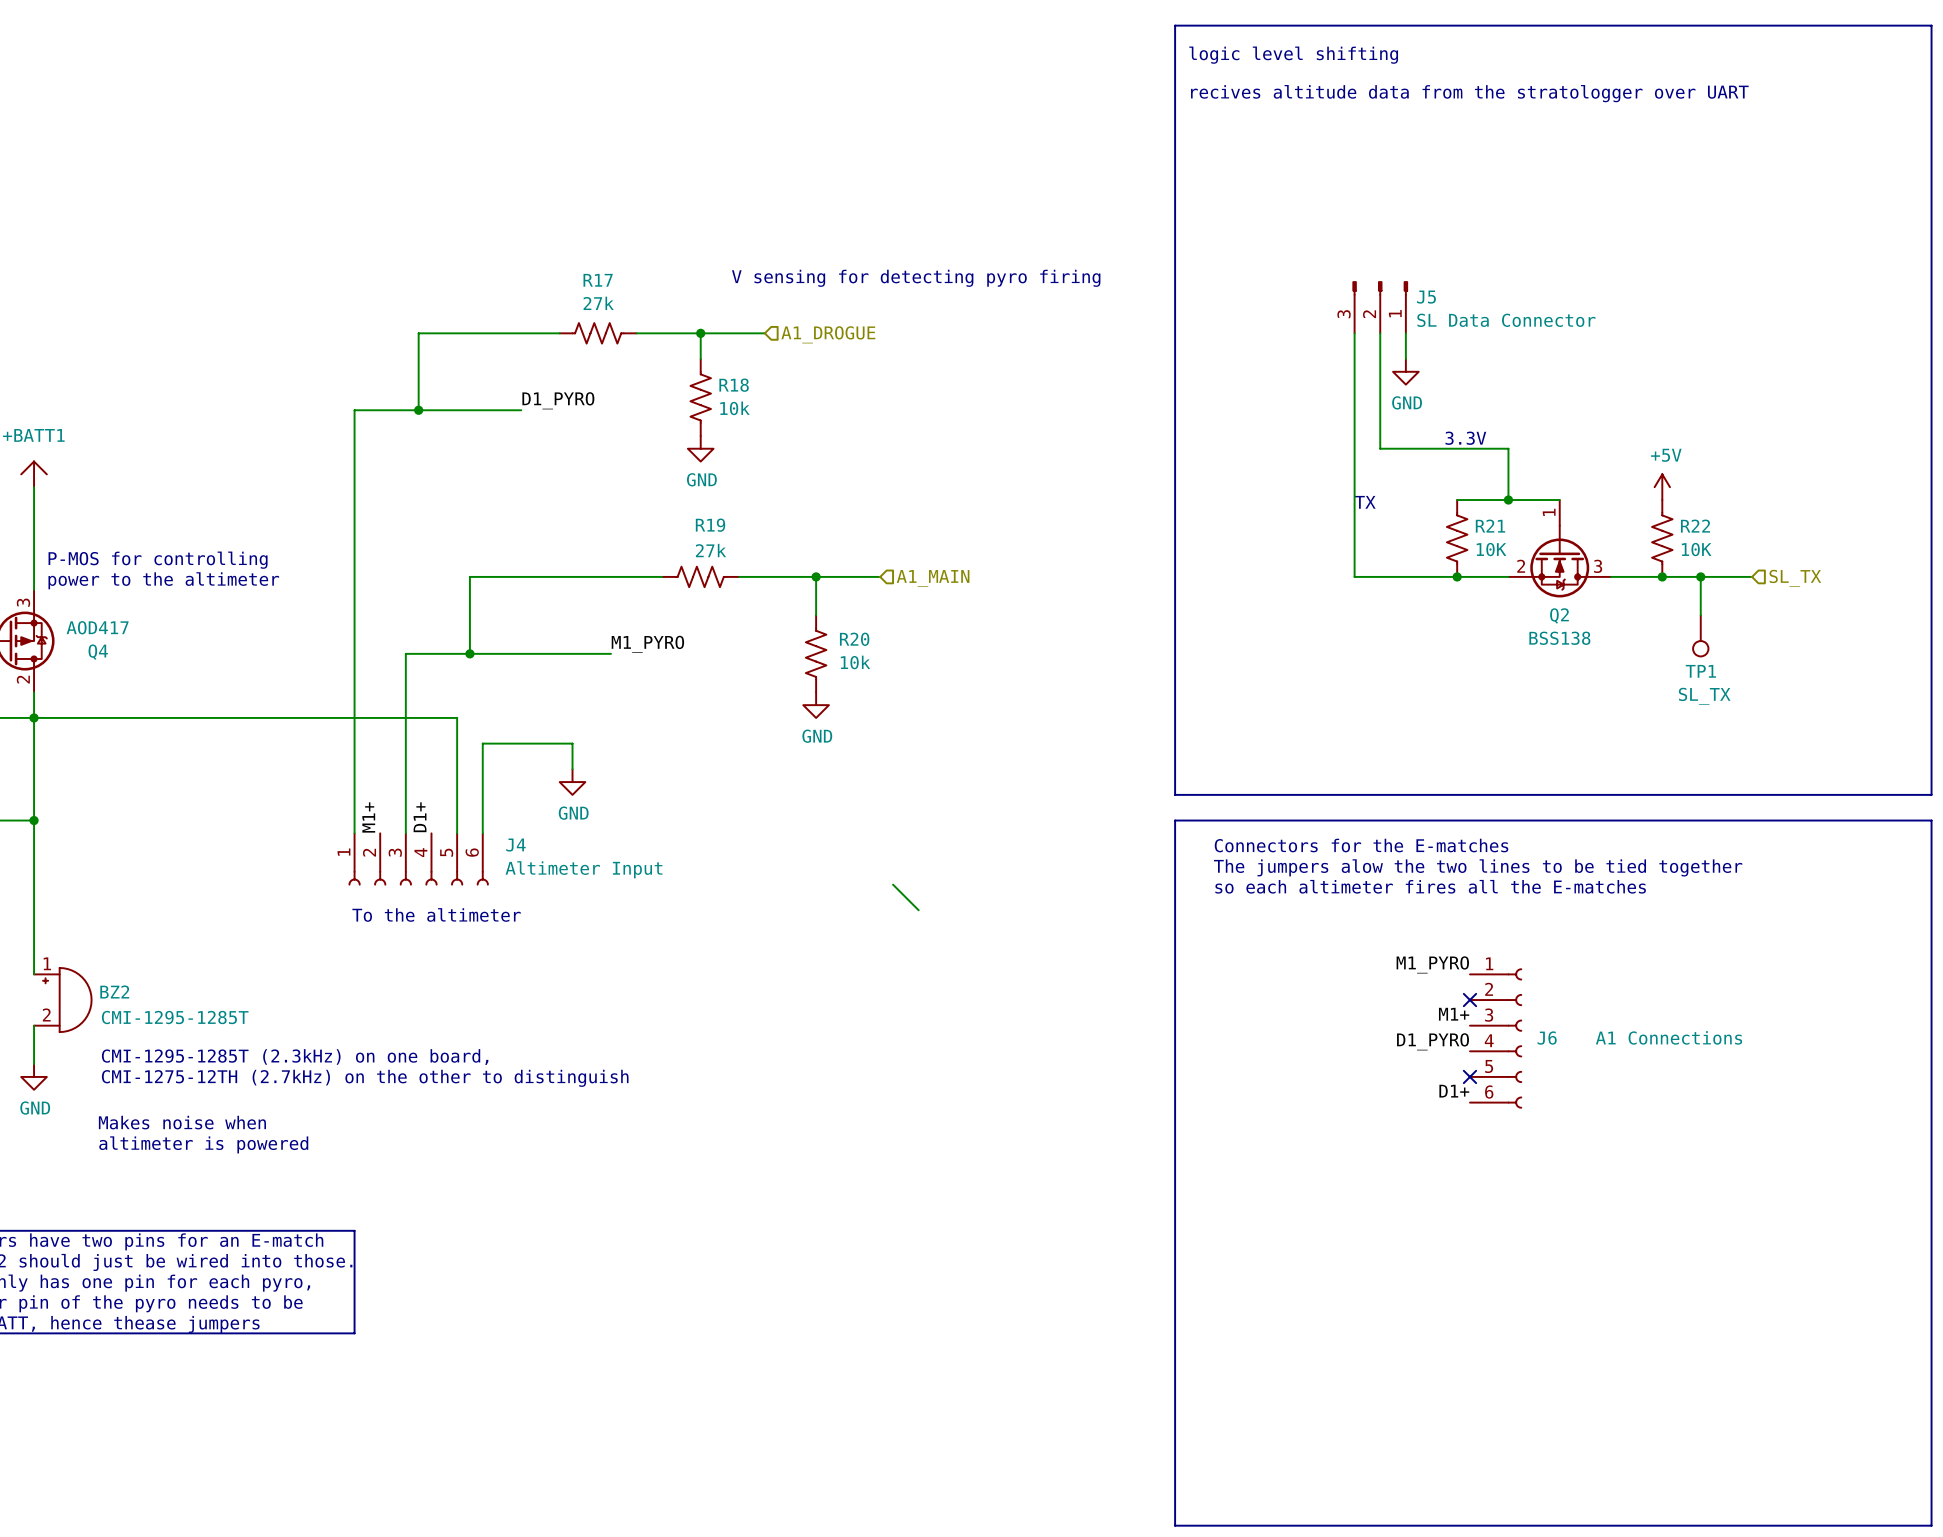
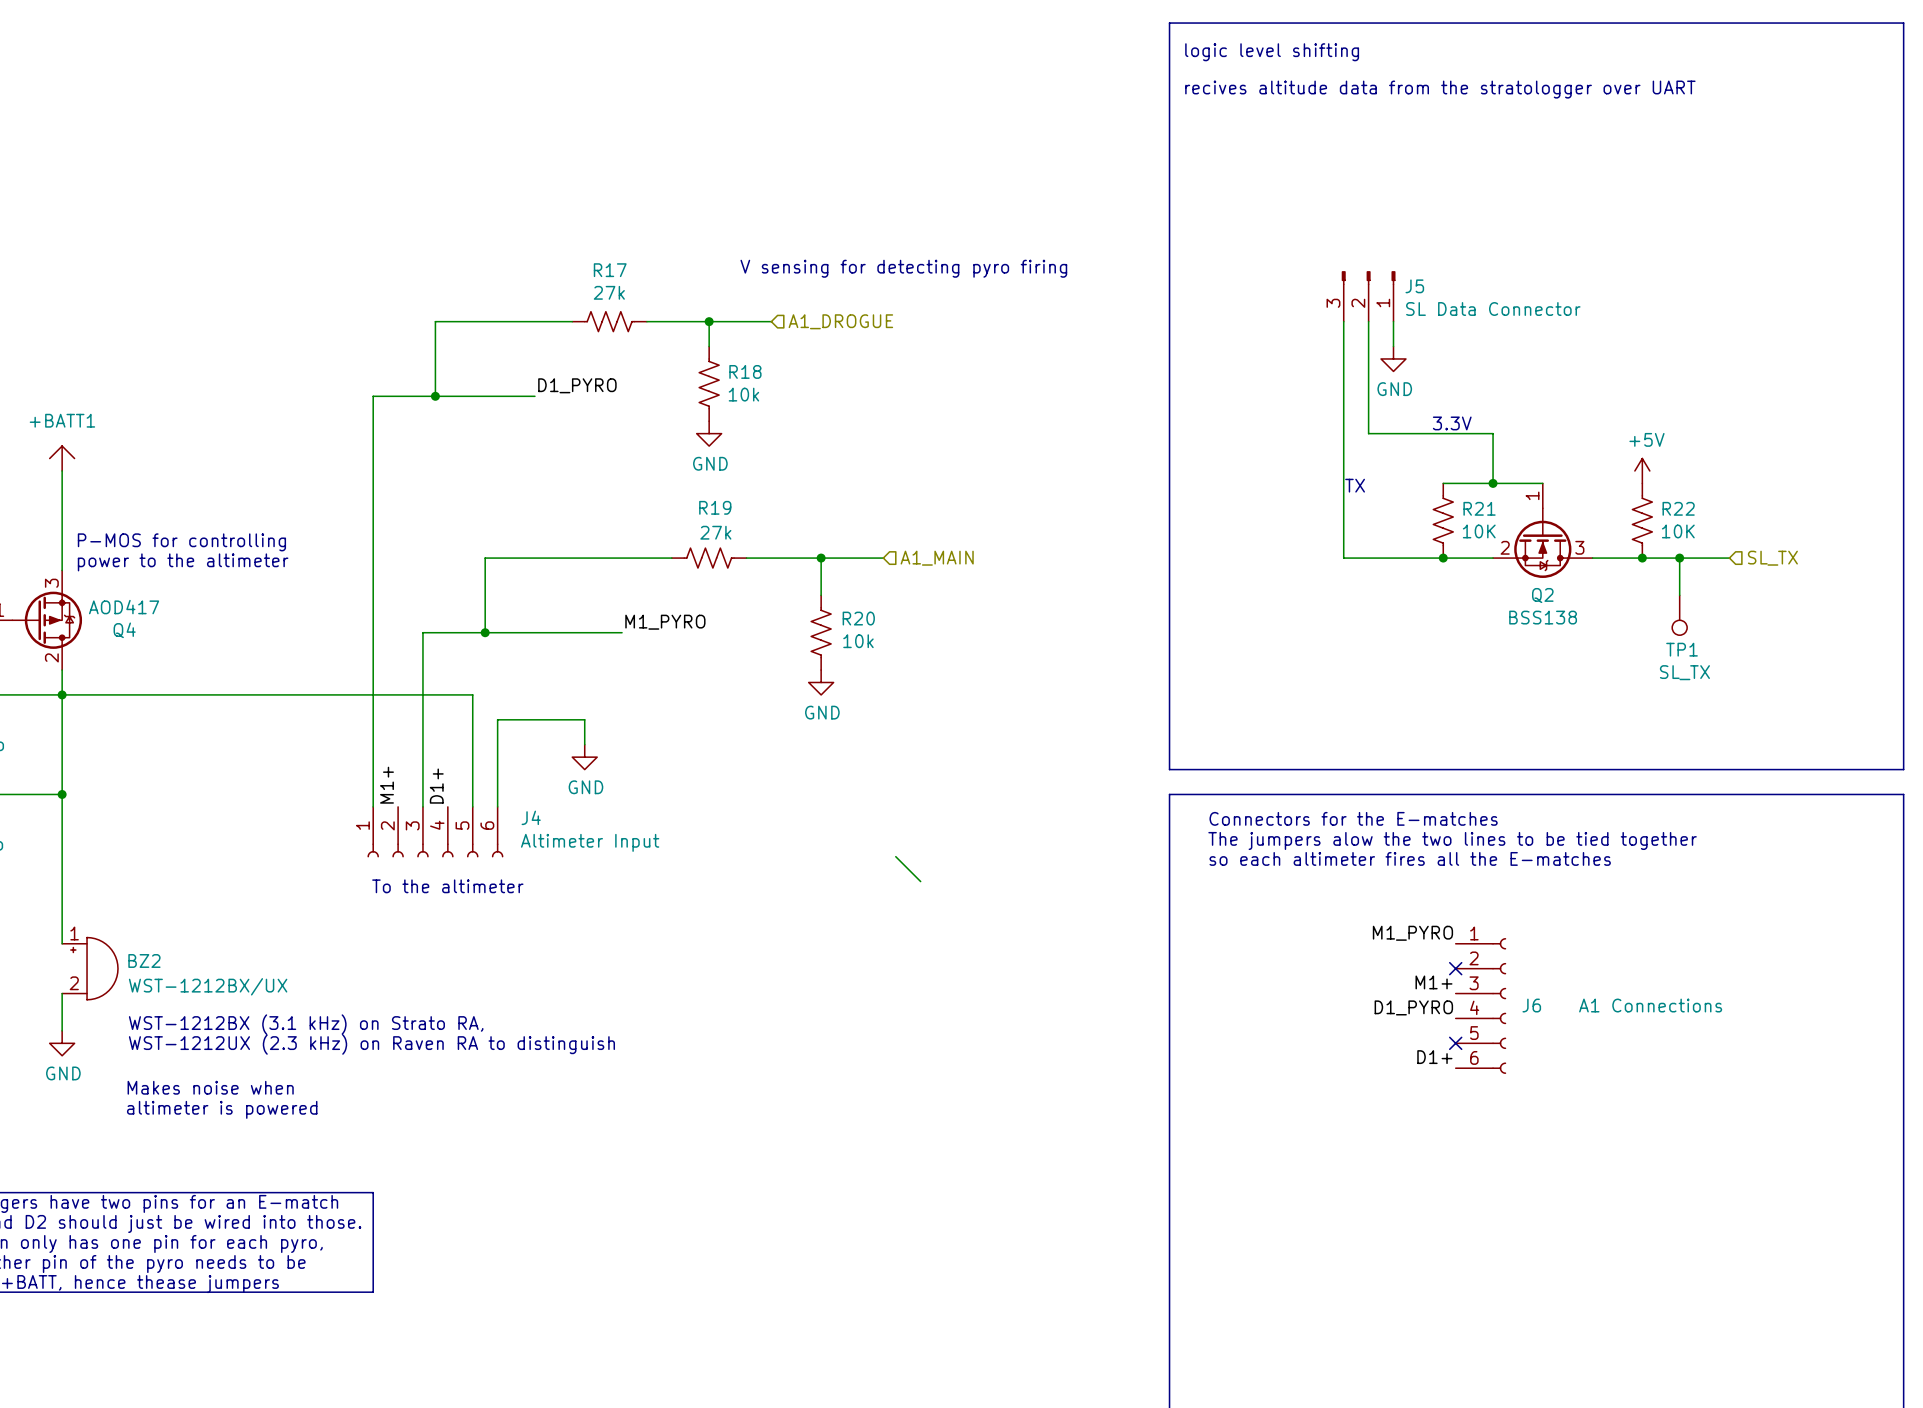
BZ2 value: CMI-1295-1285T (175, 1017) -> WST-1212BX/UX (208, 986)
text: CMI-1295-1285T (2.3kHz) on one board, (295, 1057) -> WST-1212BX (3.1 kHz) on Strato RA, (306, 1024)
text: CMI-1275-12TH (2.7kHz) on the other to distinguish (365, 1078) -> WST-1212UX (2.3 kHz) on Raven RA to distinguish (371, 1044)

